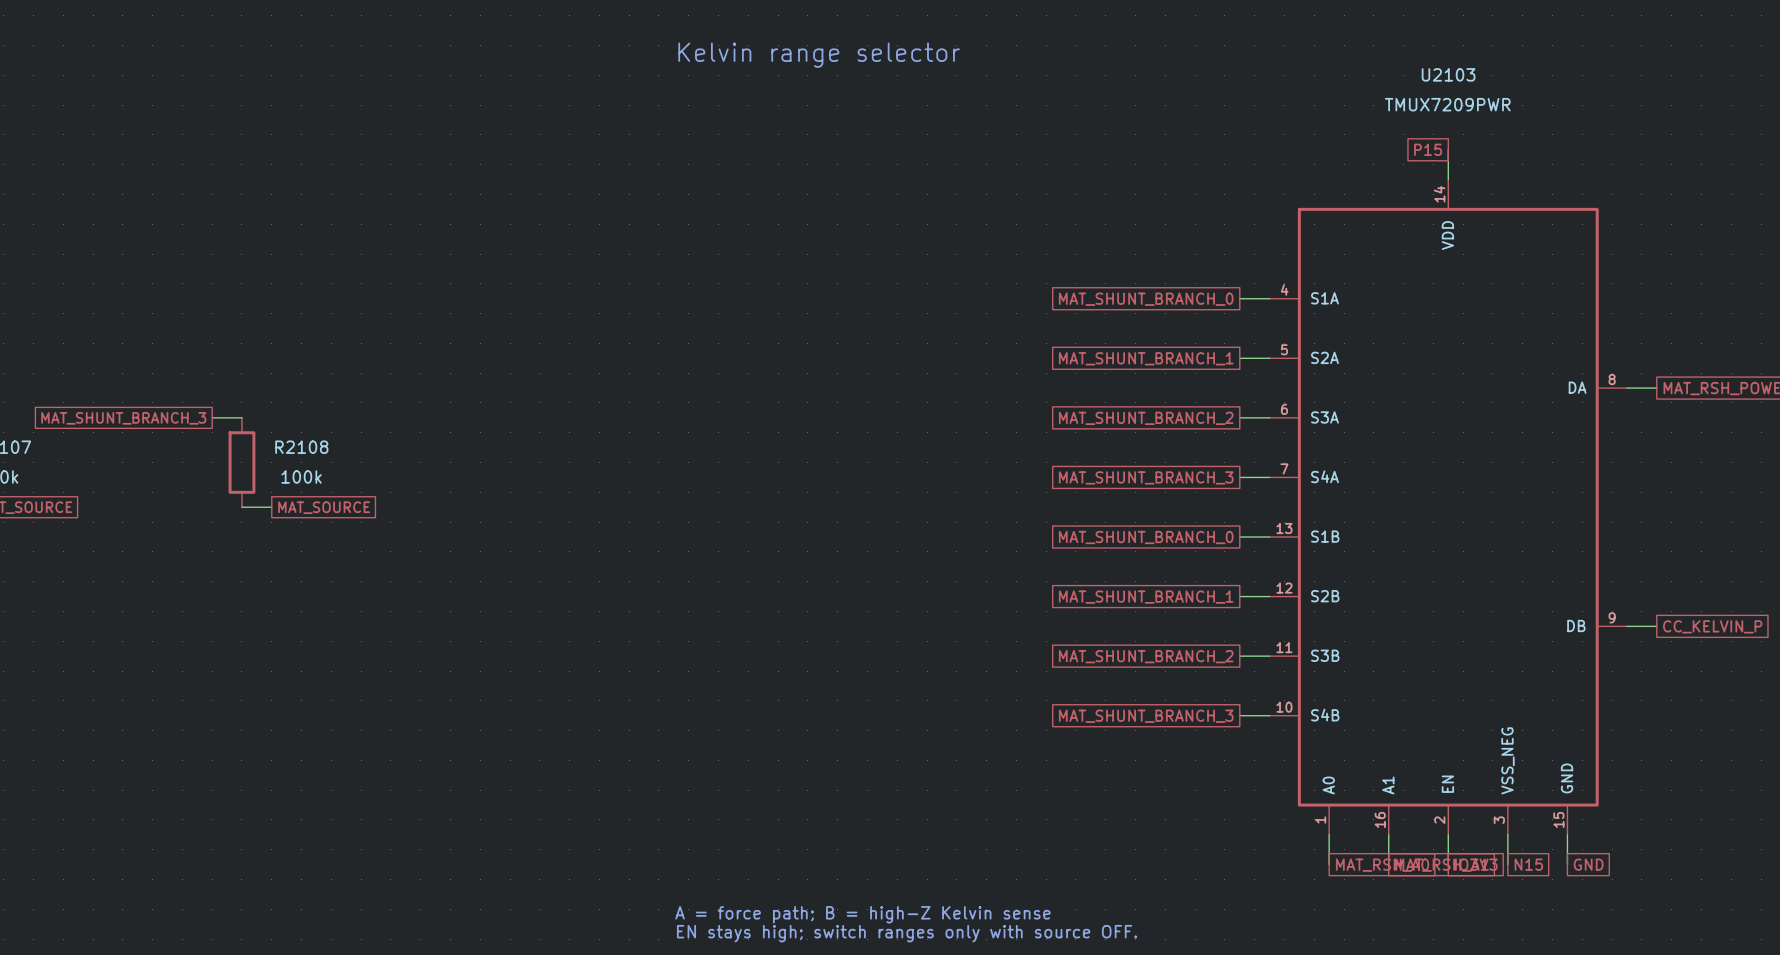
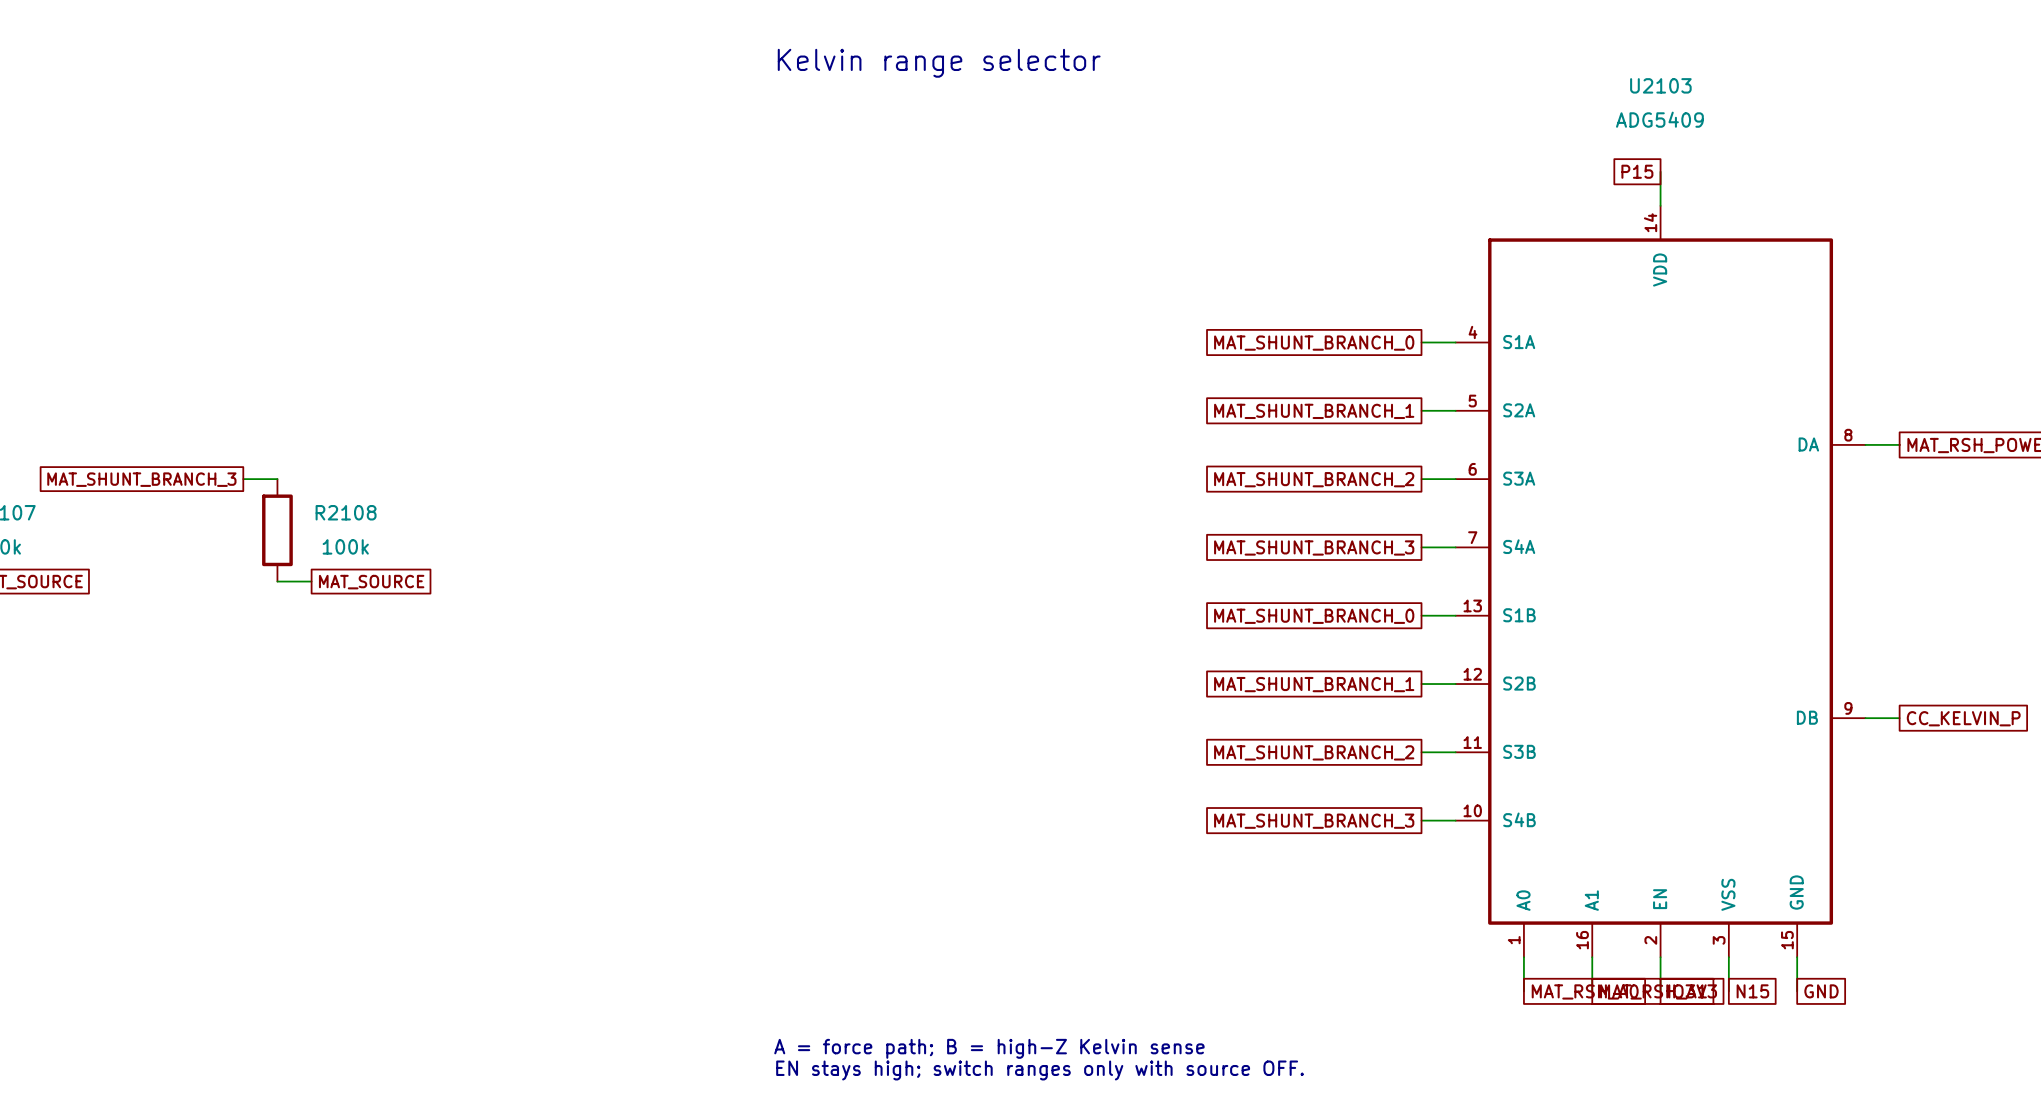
U2103 value: TMUX7209PWR (1447, 104) -> ADG5409 (1659, 119)
U2103 pin name: VSS_NEG (1507, 760) -> VSS (1728, 894)

